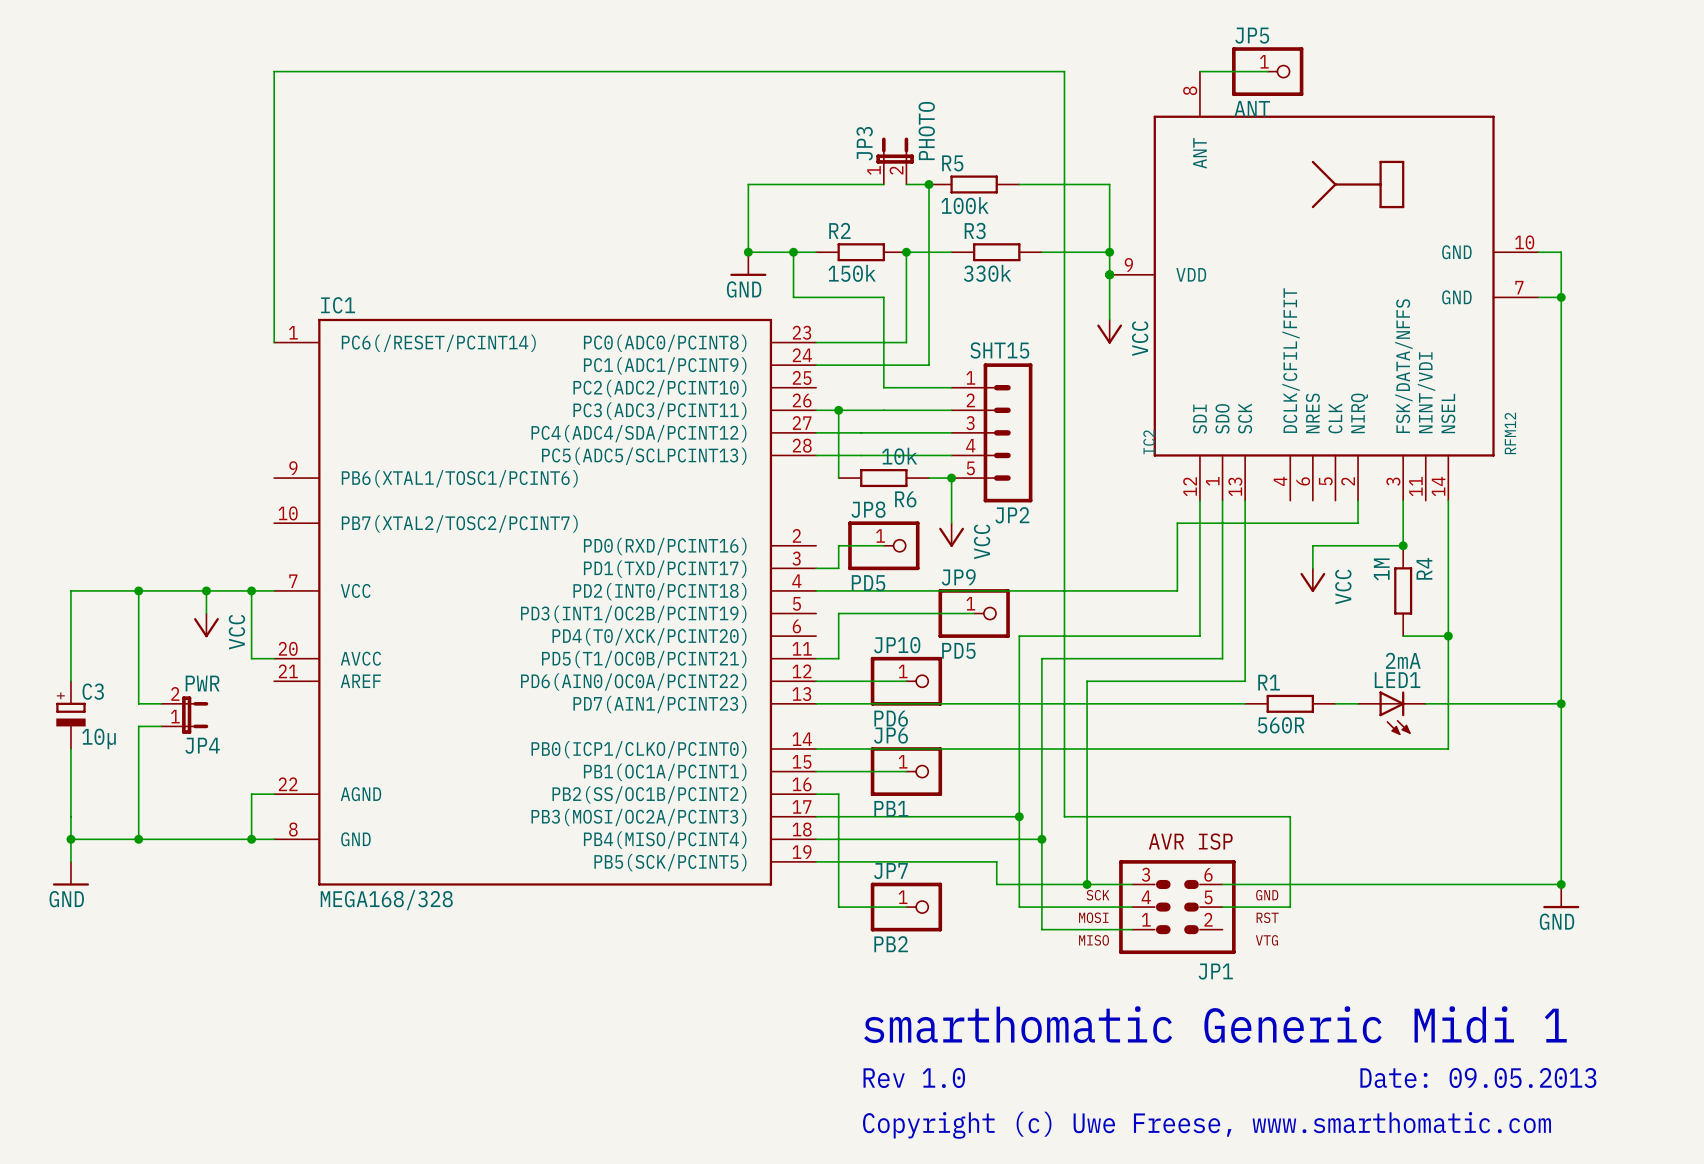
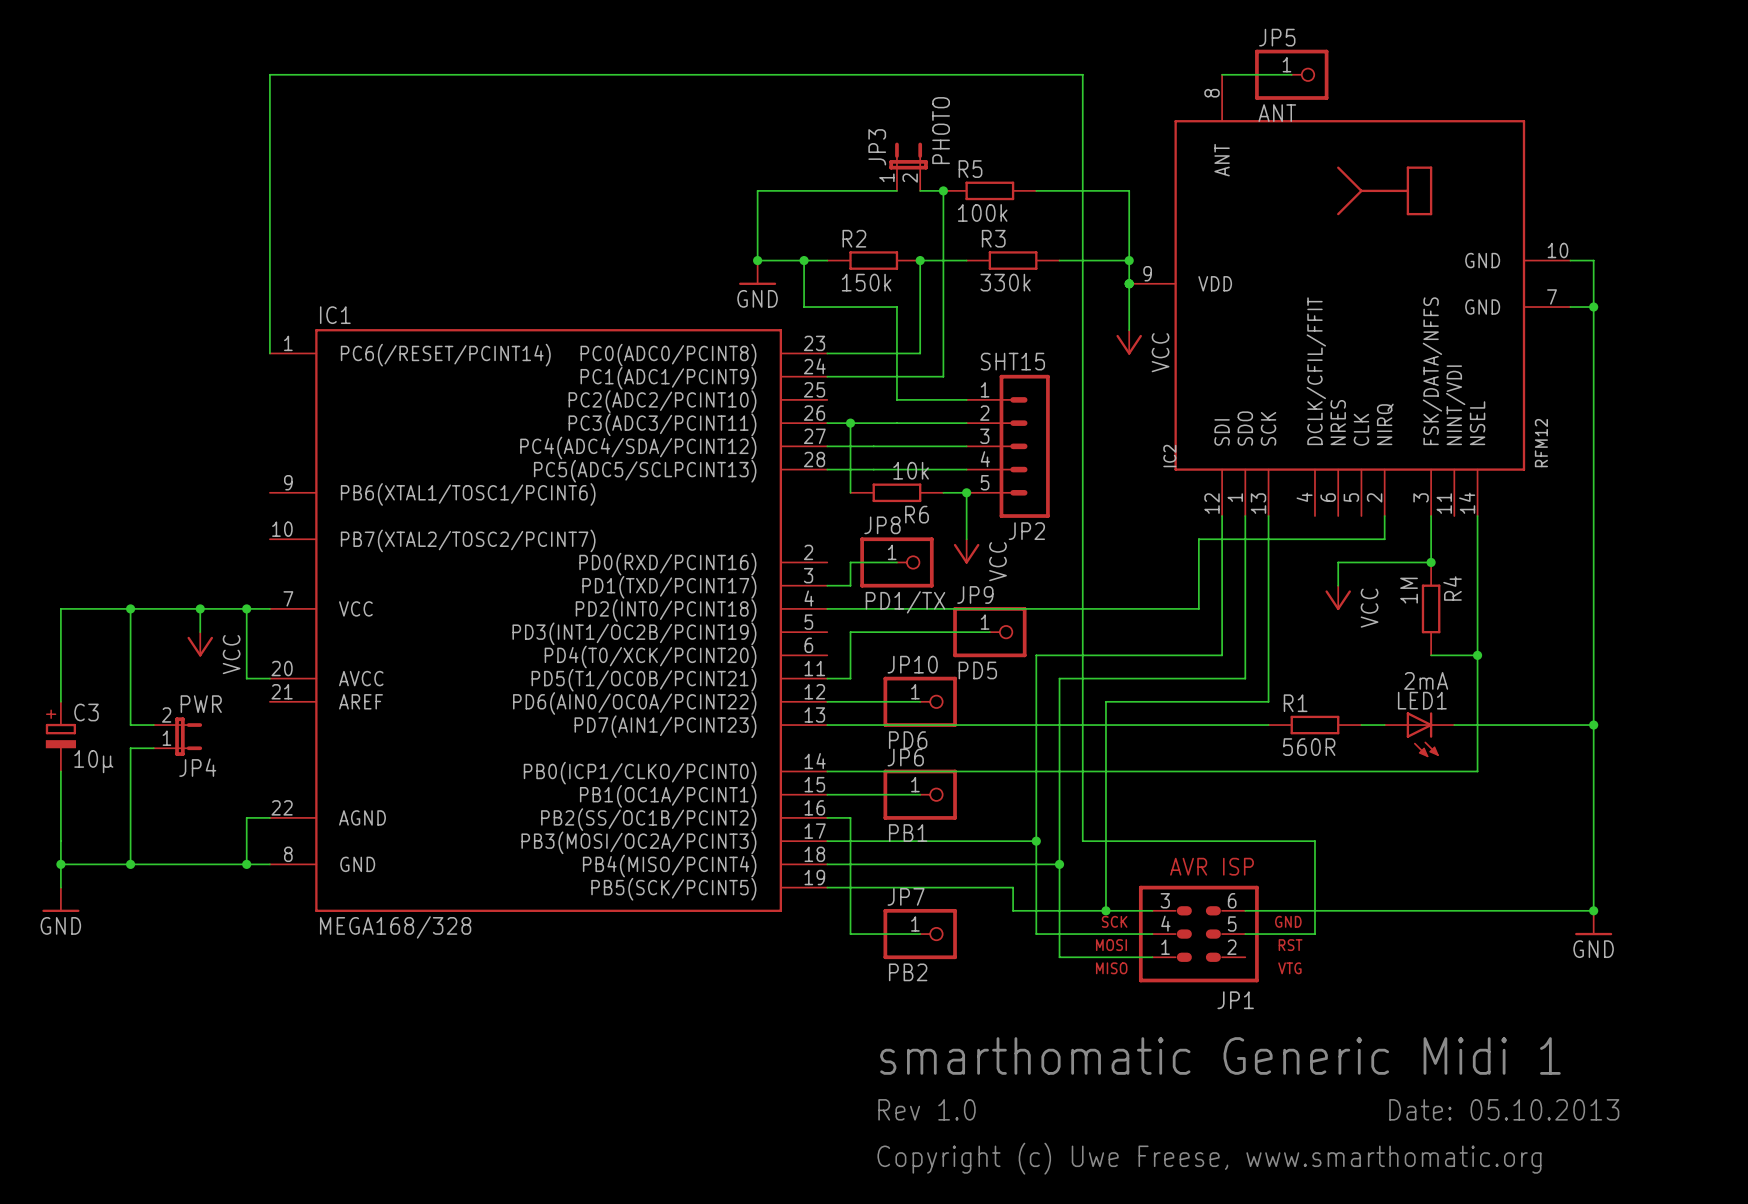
JP8 value: PD5 (868, 583) -> PD1/TX (905, 602)
text: Date: 09.05.2013 (1478, 1077) -> Date: 05.10.2013 (1504, 1109)
text: Copyright (c) Uwe Freese, www.smarthomatic.com (1207, 1125) -> Copyright (c) Uwe Freese, www.smarthomatic.org (1209, 1158)

